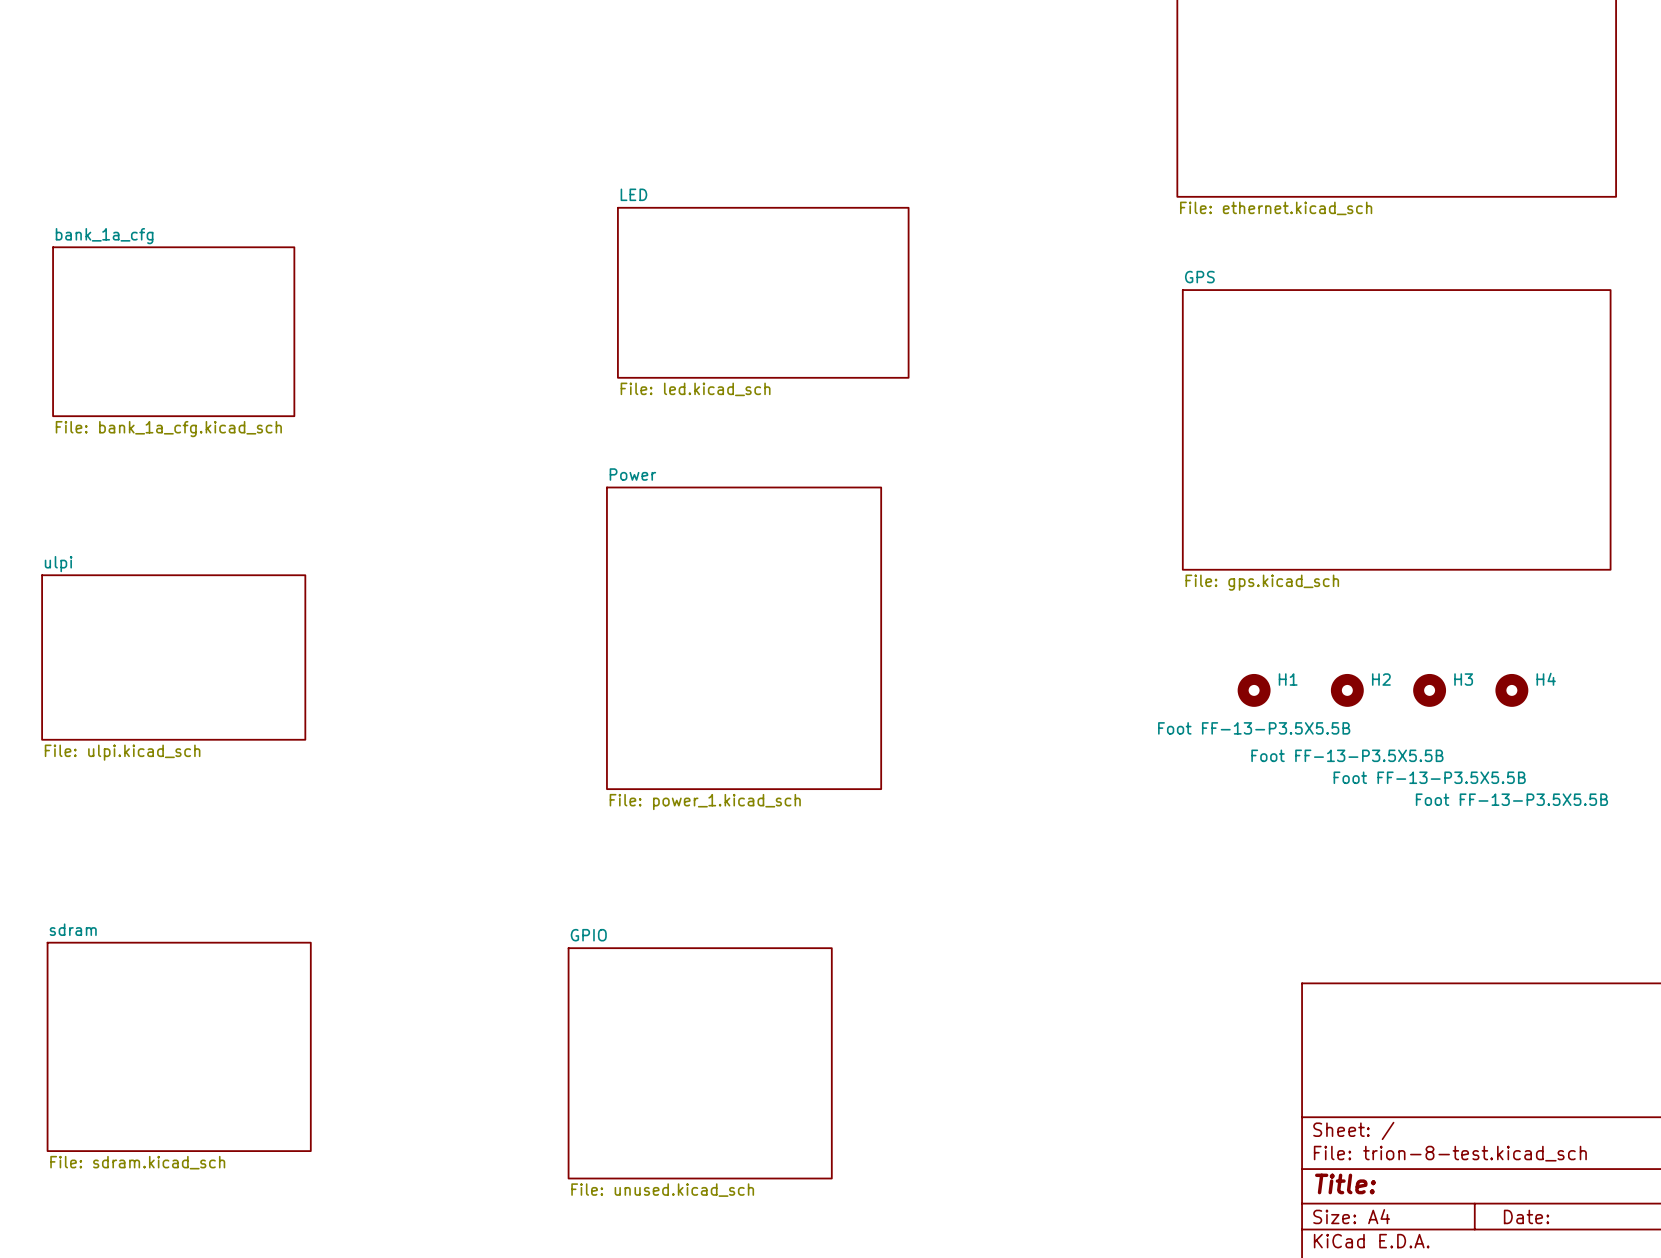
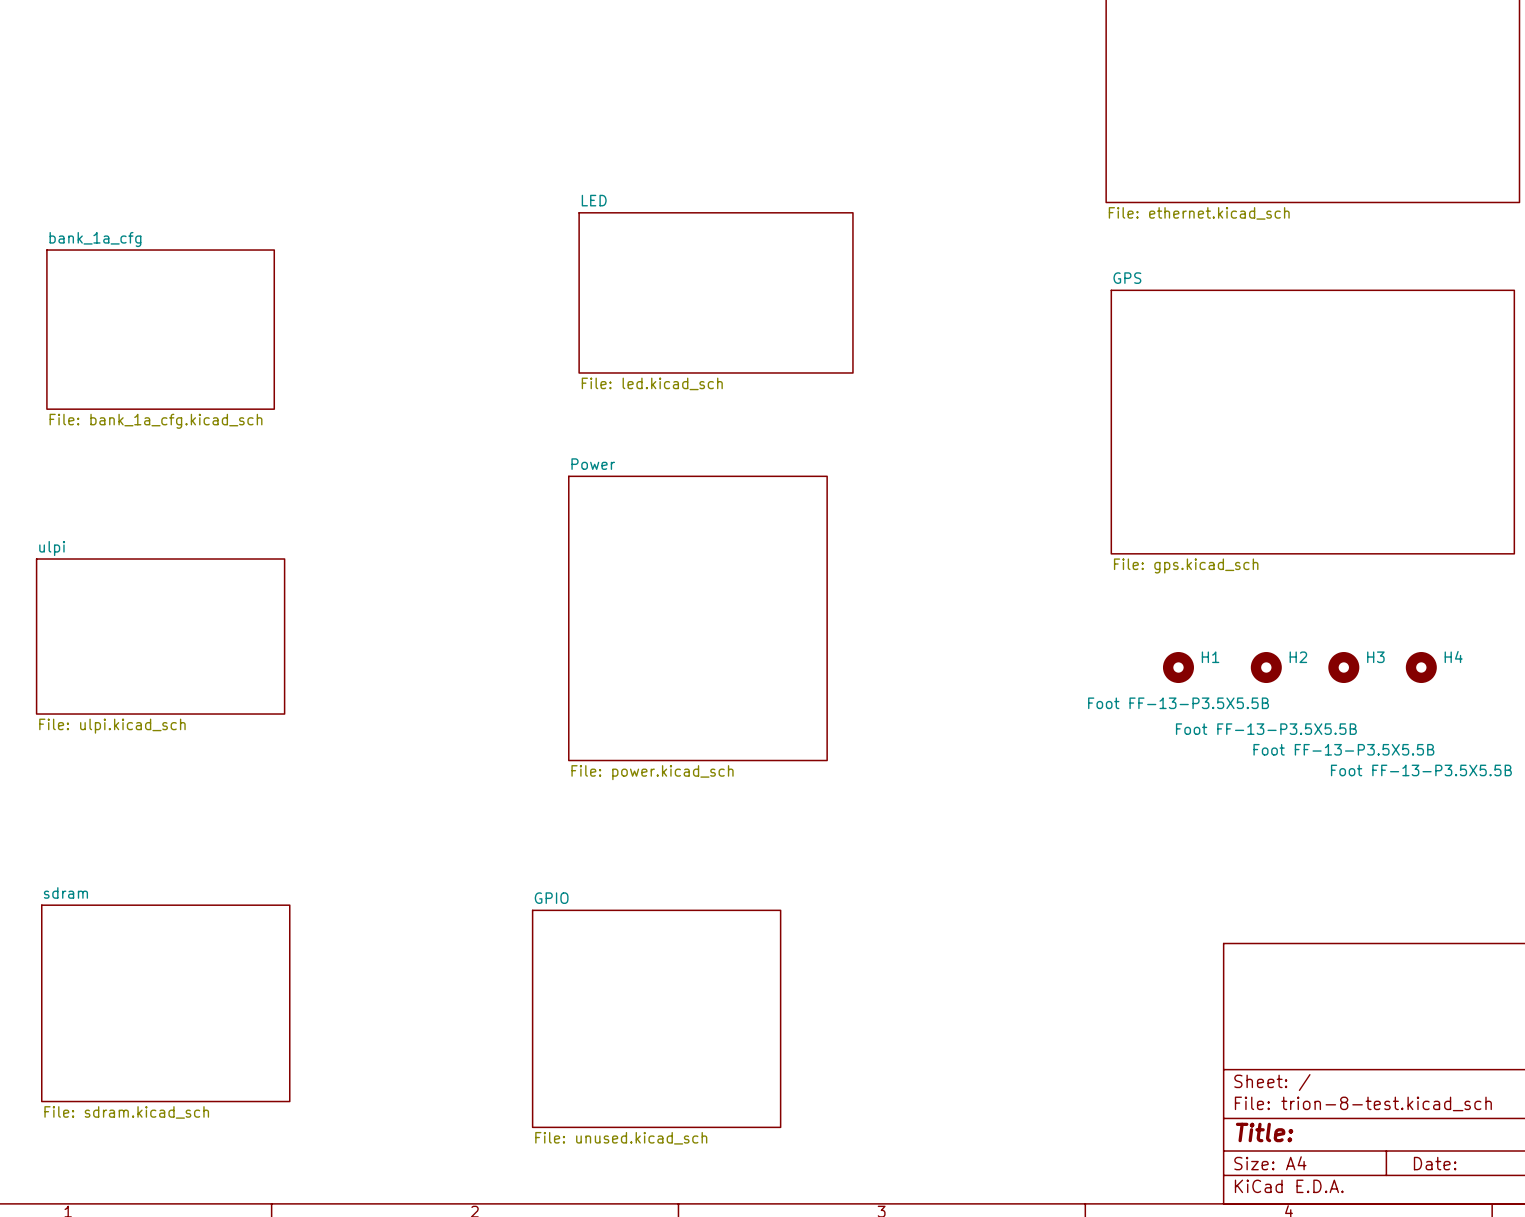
sheet Power value: File: power_1.kicad_sch (705, 802) -> File: power.kicad_sch (652, 772)

